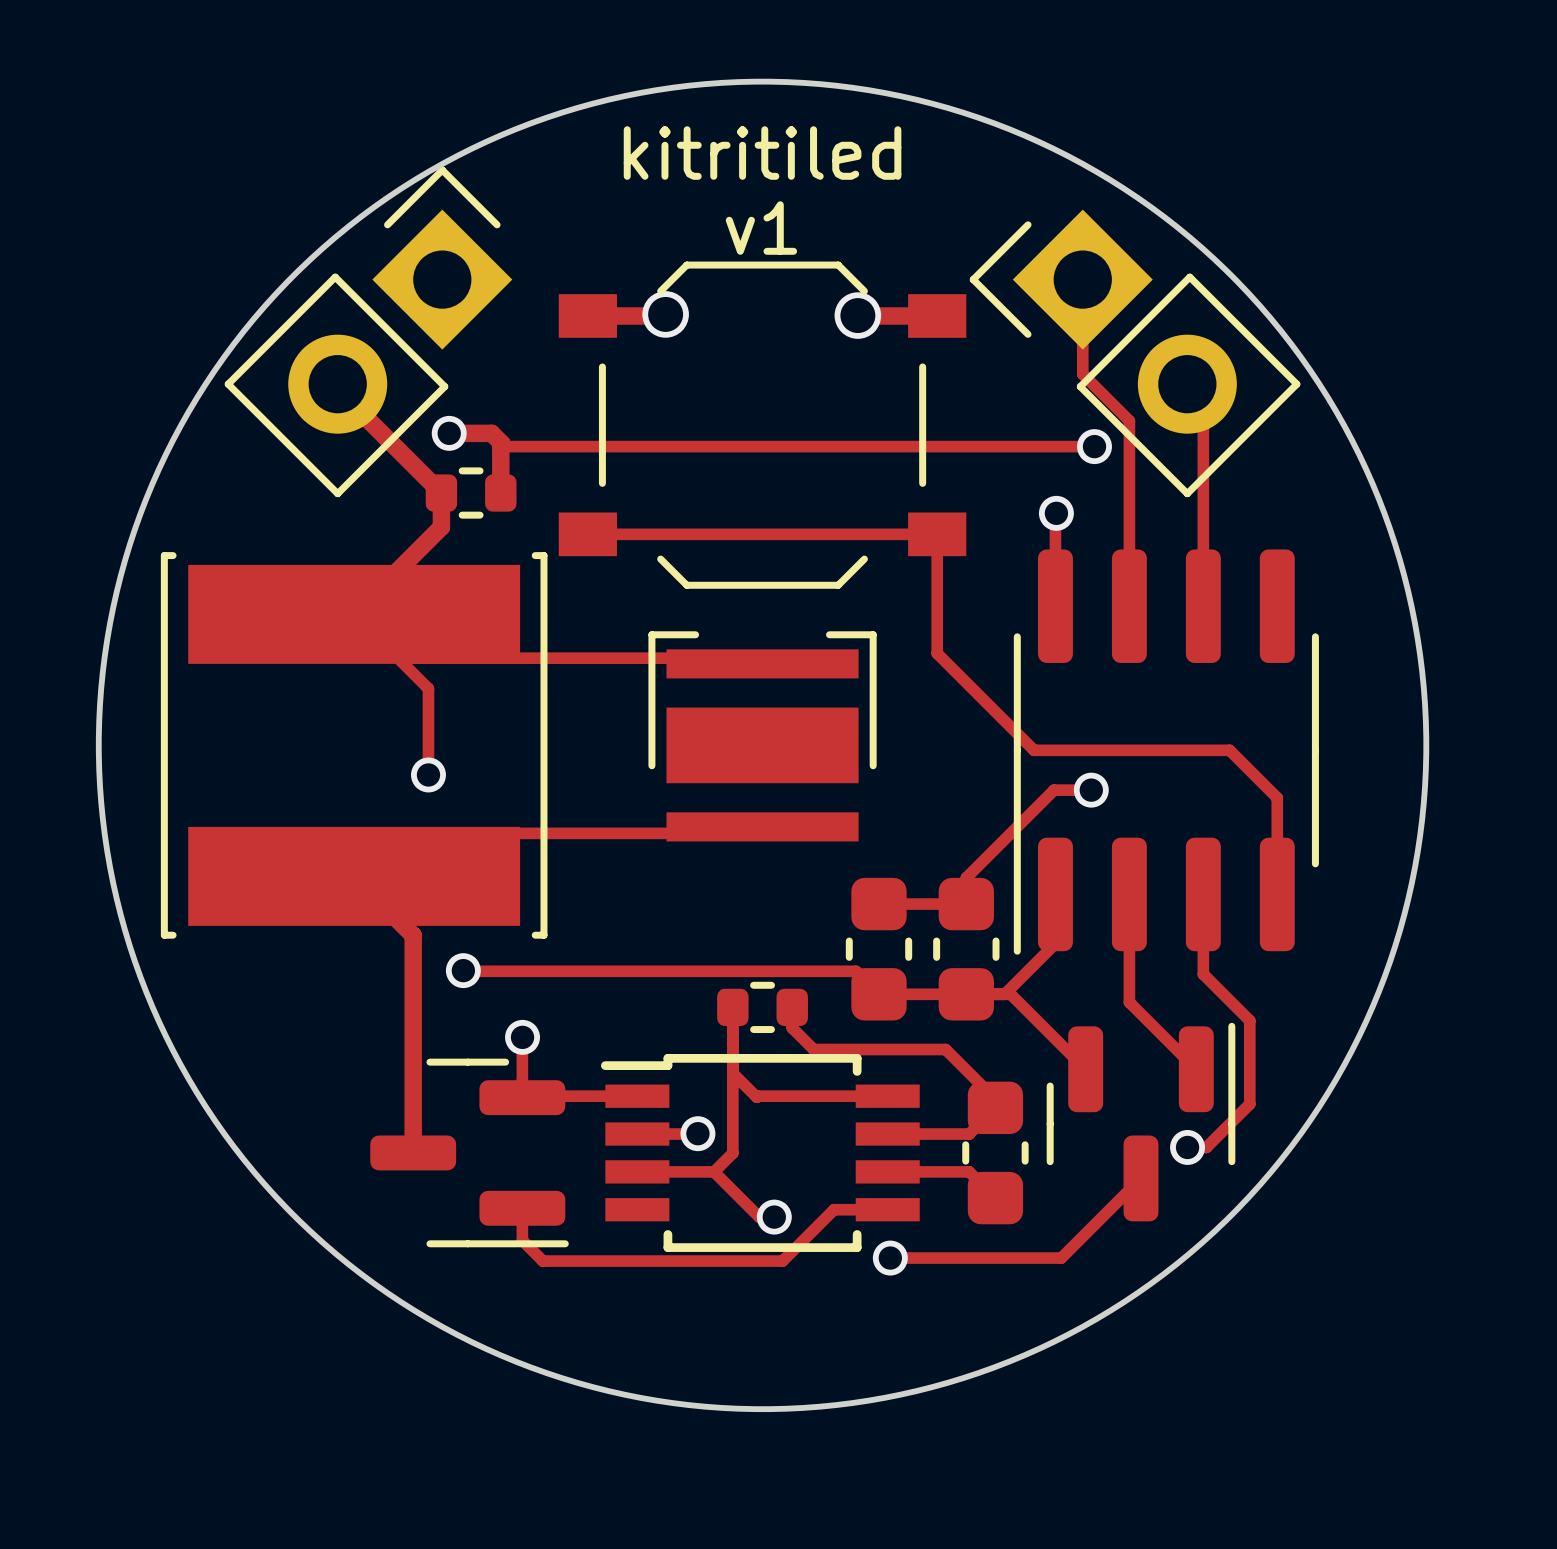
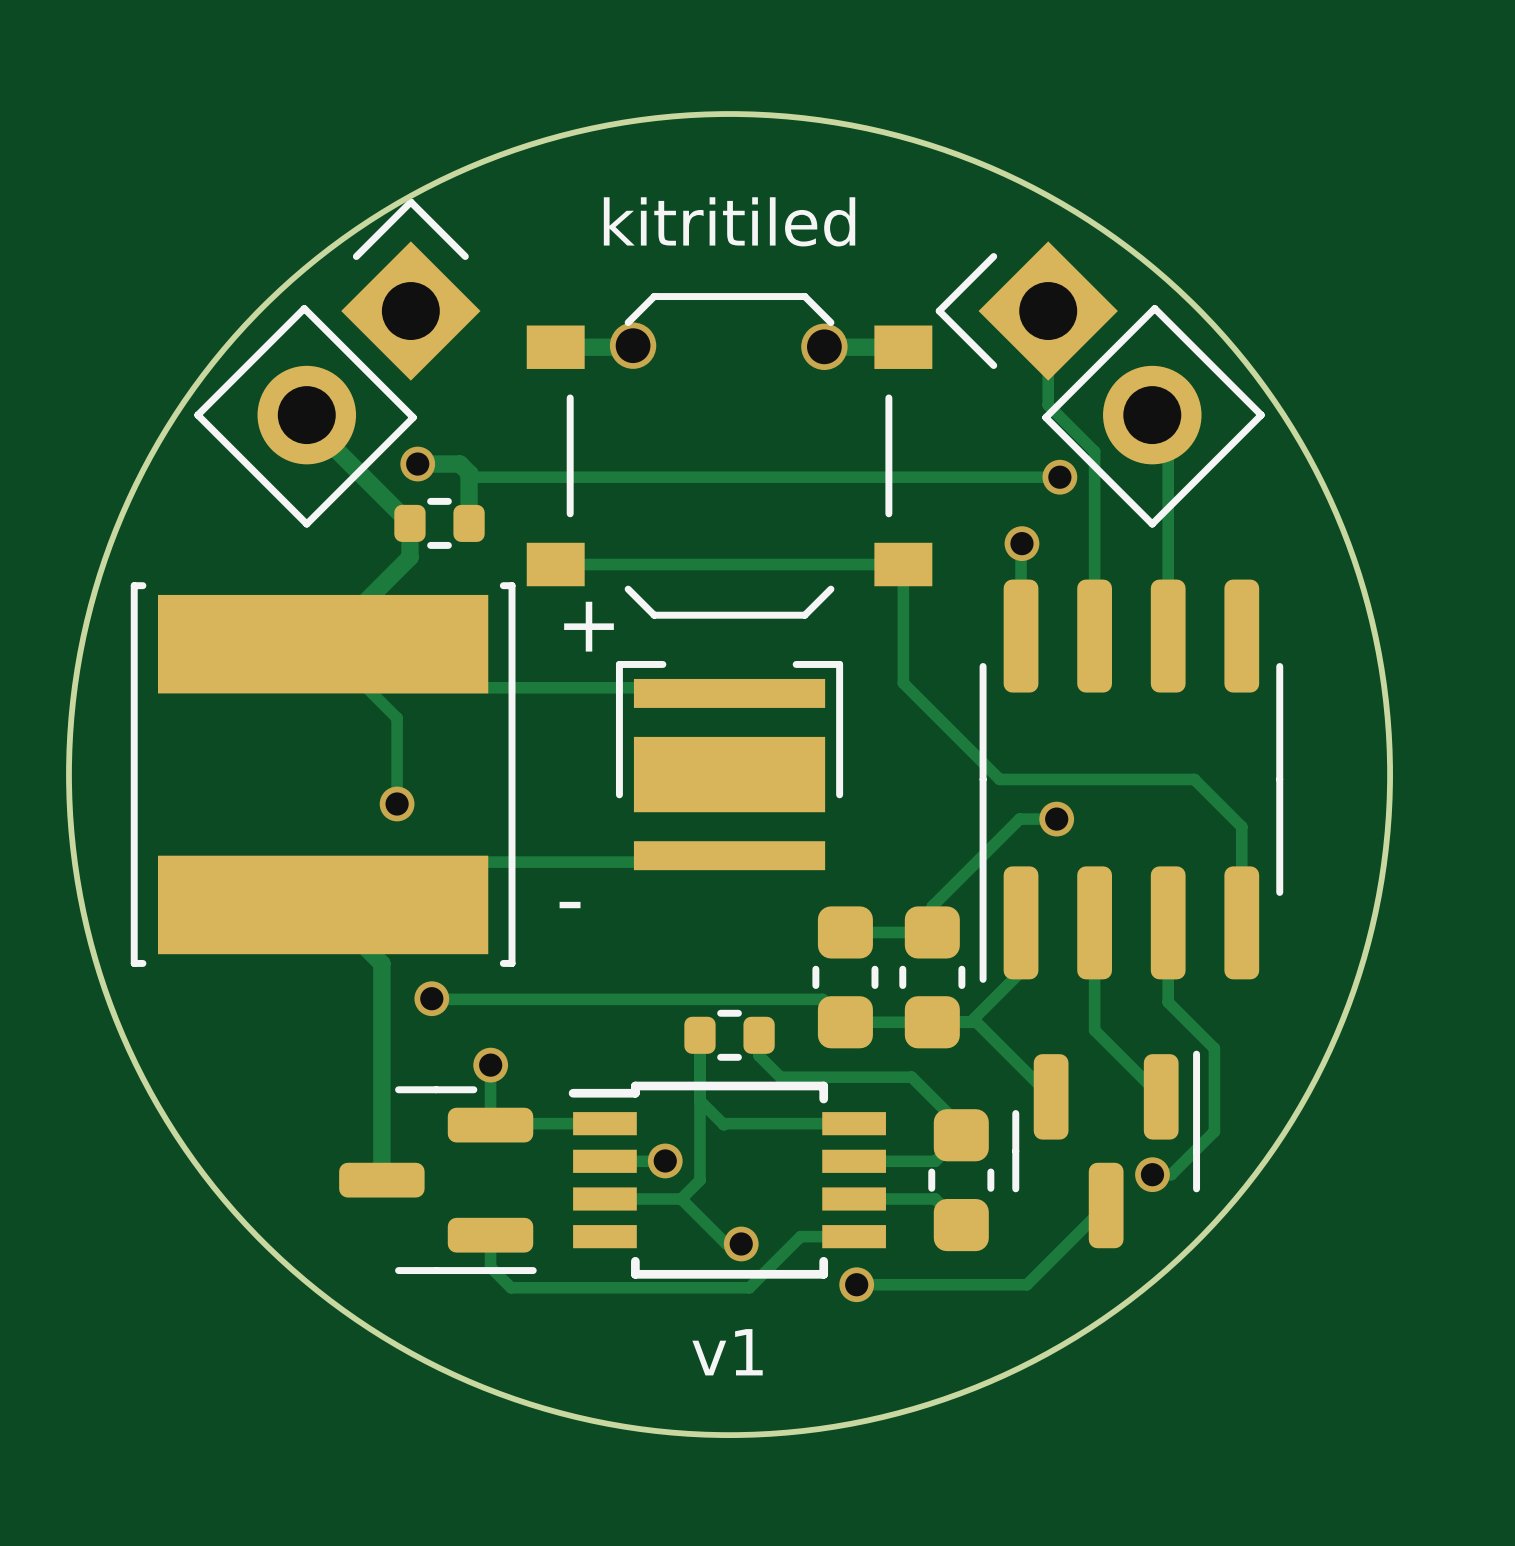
text position: kitritiled (762, 153) -> kitritiled (729, 221)
text position: v1 (761, 228) -> v1 (727, 1352)
text: none -> + (589, 626)
text: none -> - (570, 905)

